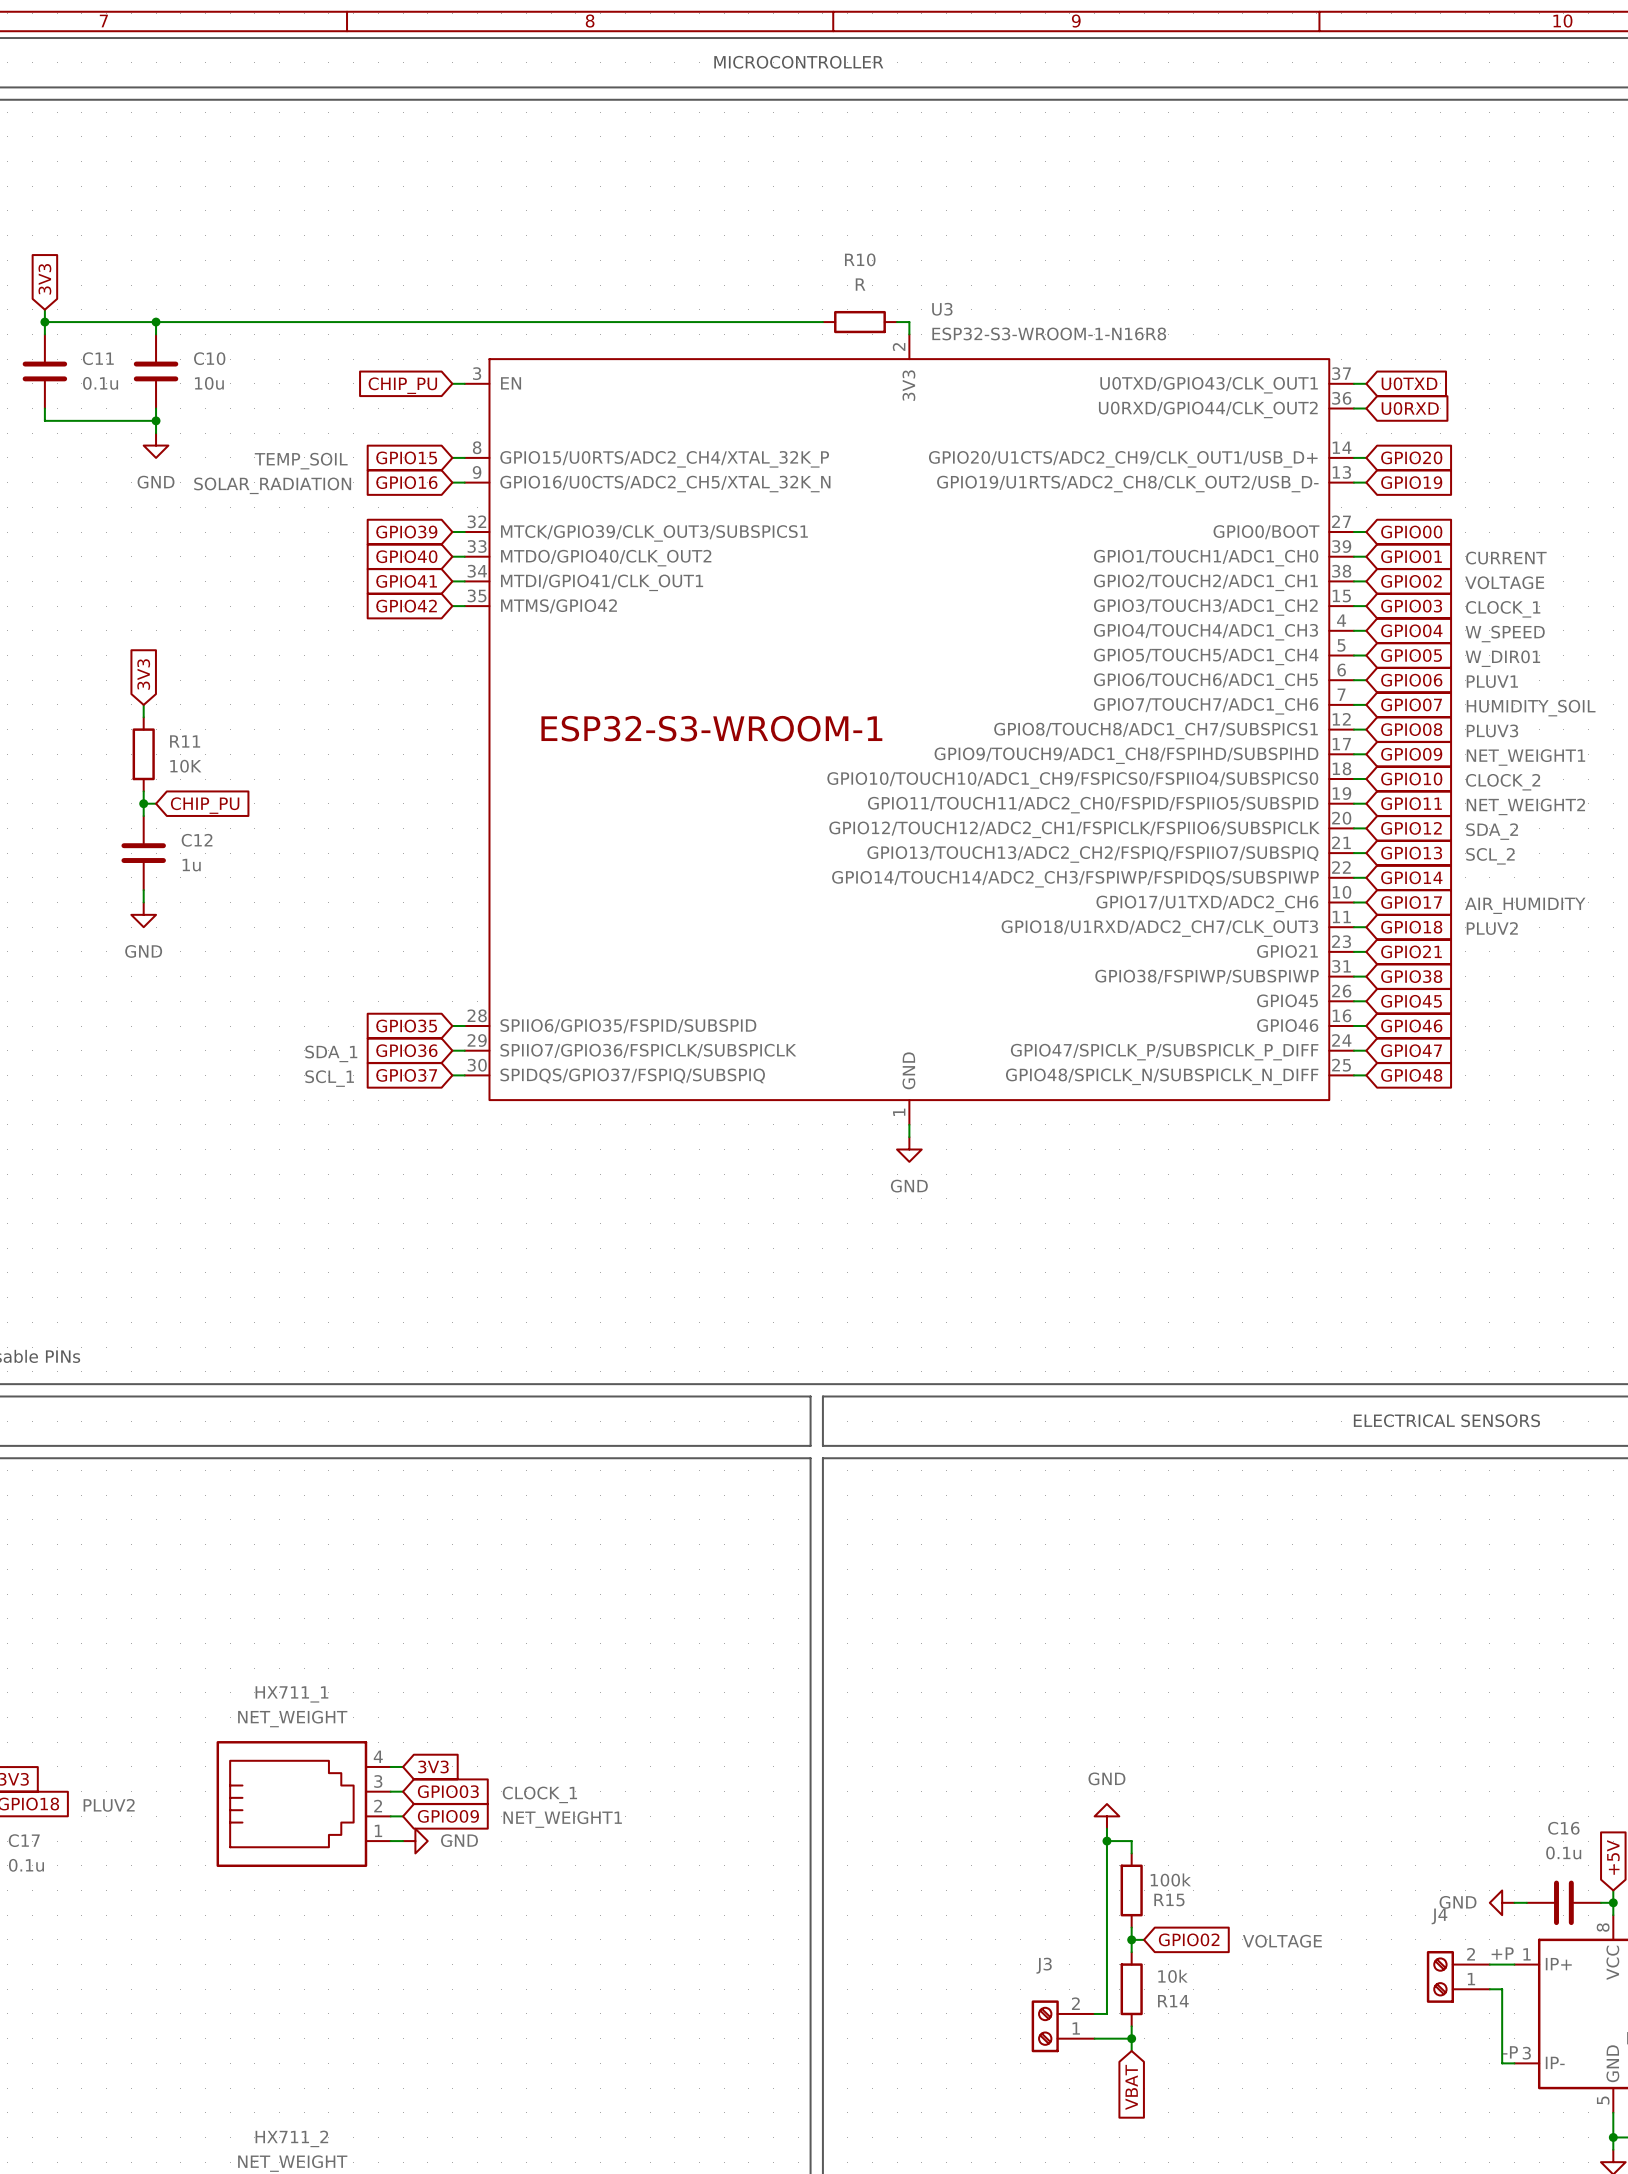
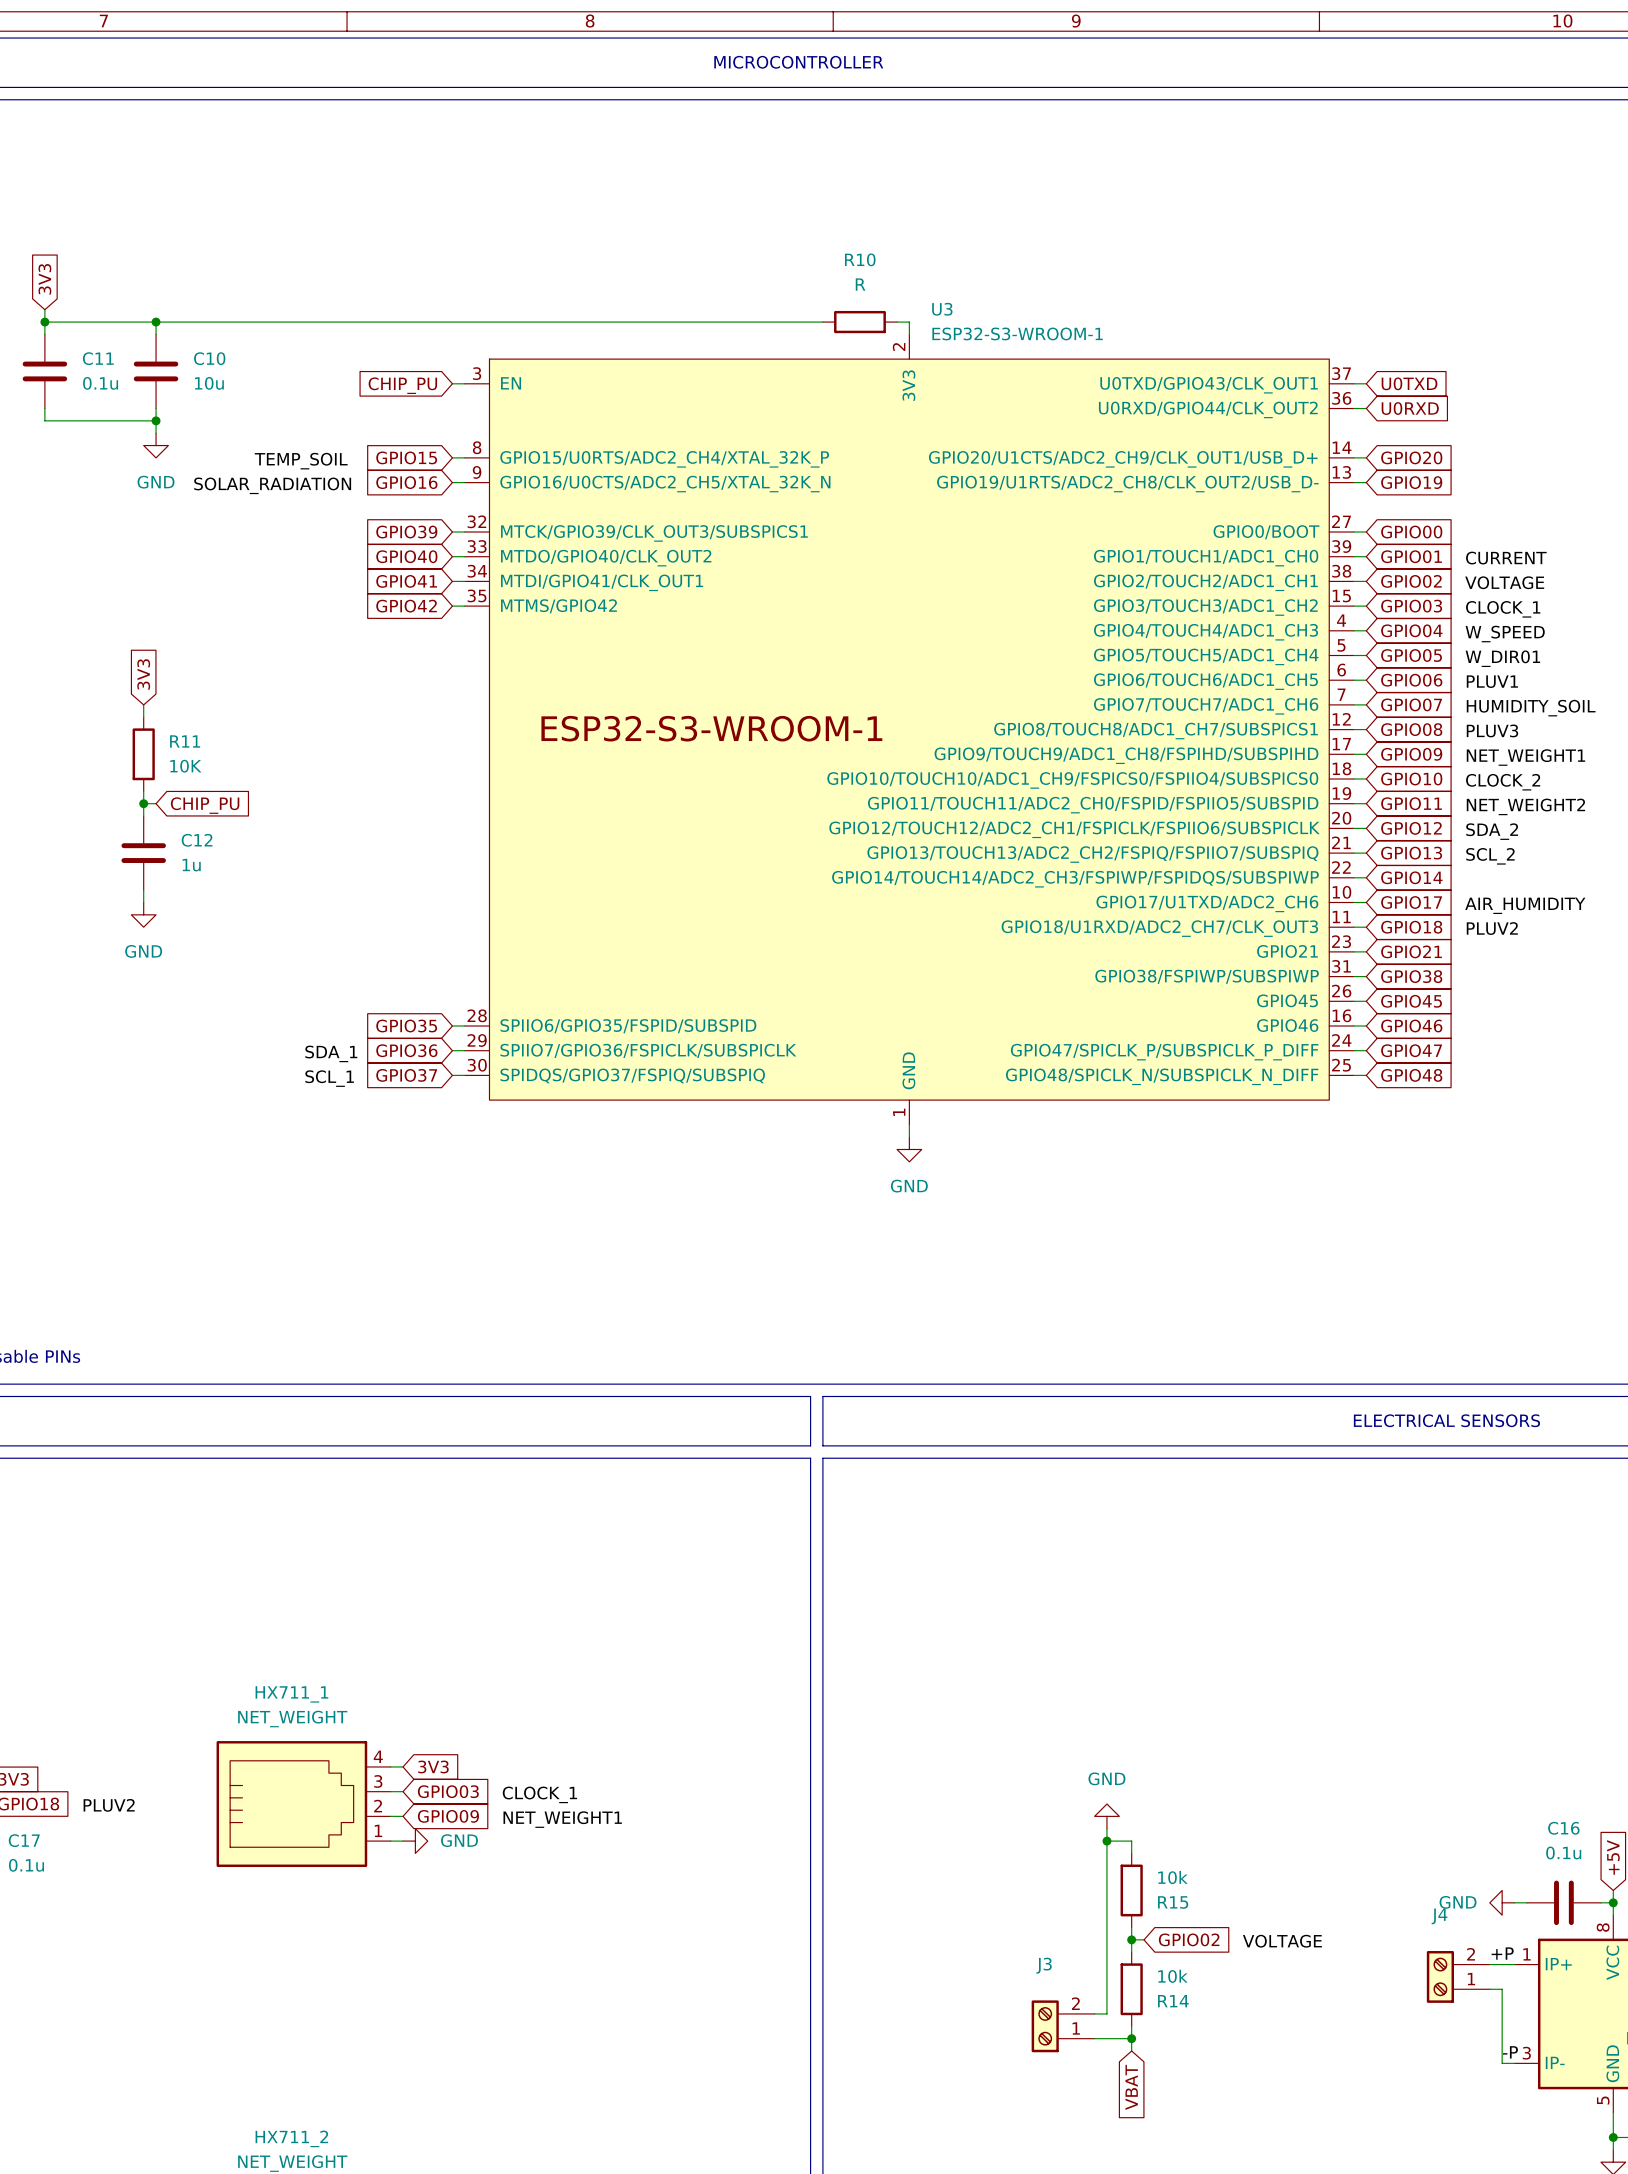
U3 value: ESP32-S3-WROOM-1-N16R8 (1049, 333) -> ESP32-S3-WROOM-1 (1017, 333)
R15 value: 100k (1170, 1879) -> 10k (1172, 1877)
R15 name position: R15 (1169, 1900) -> R15 (1173, 1902)

